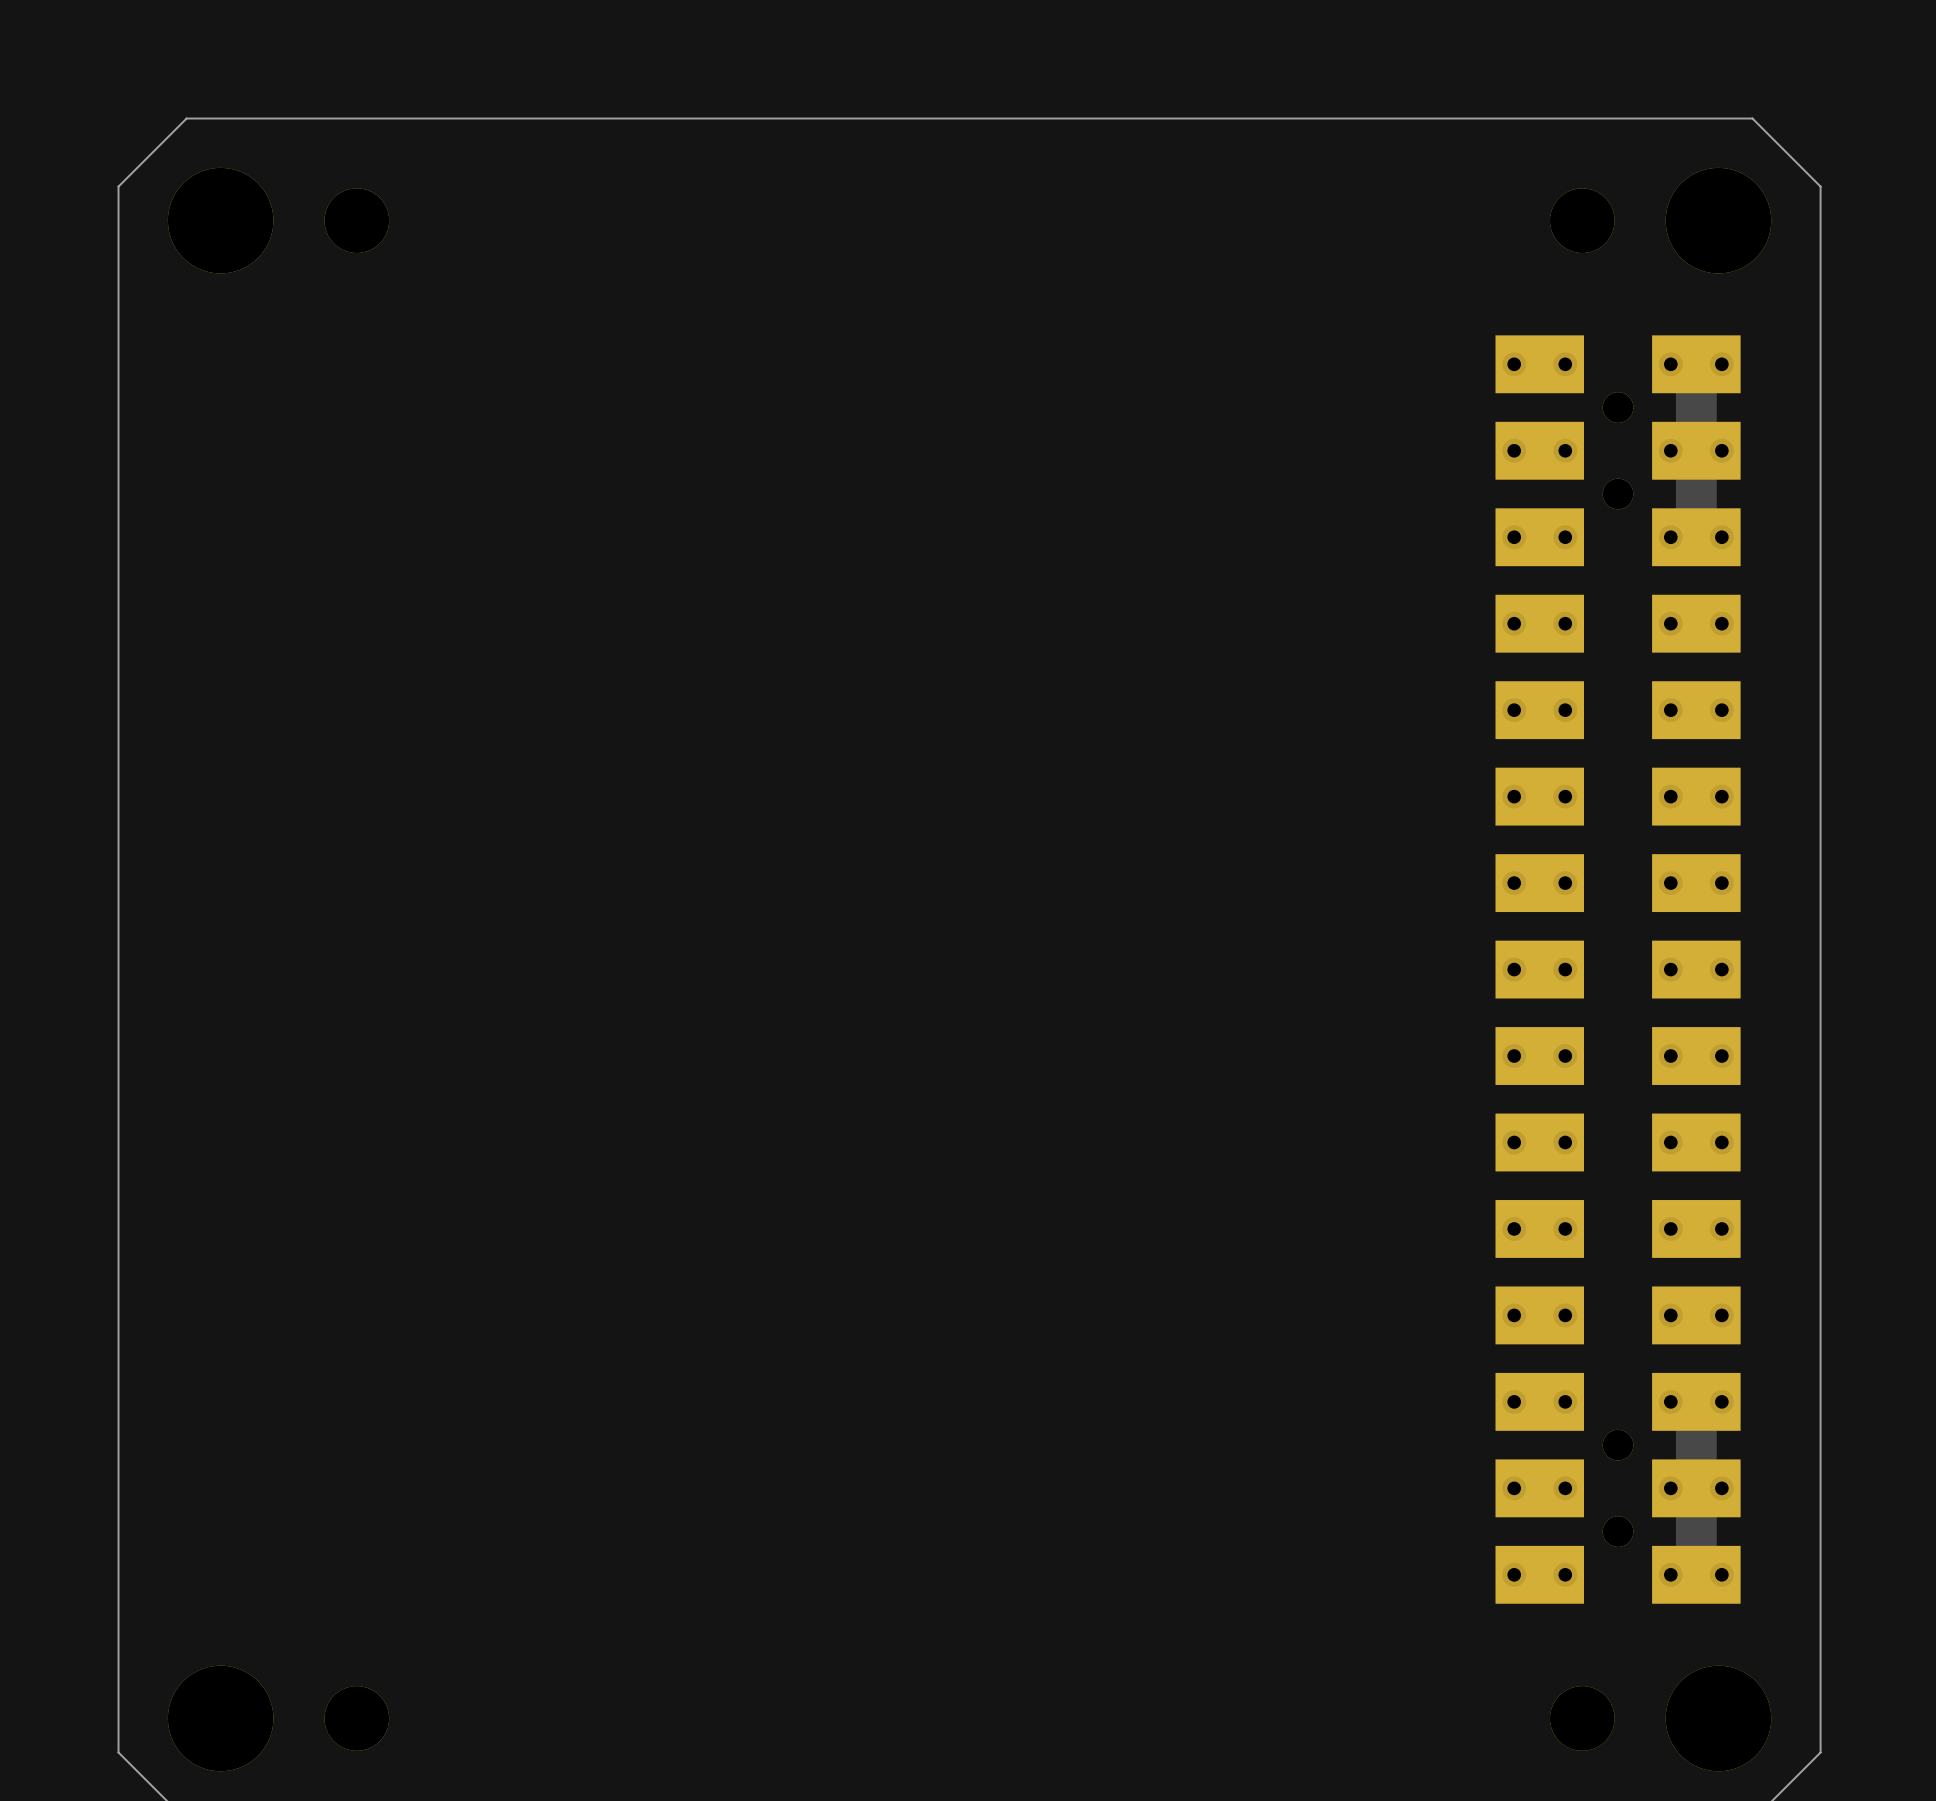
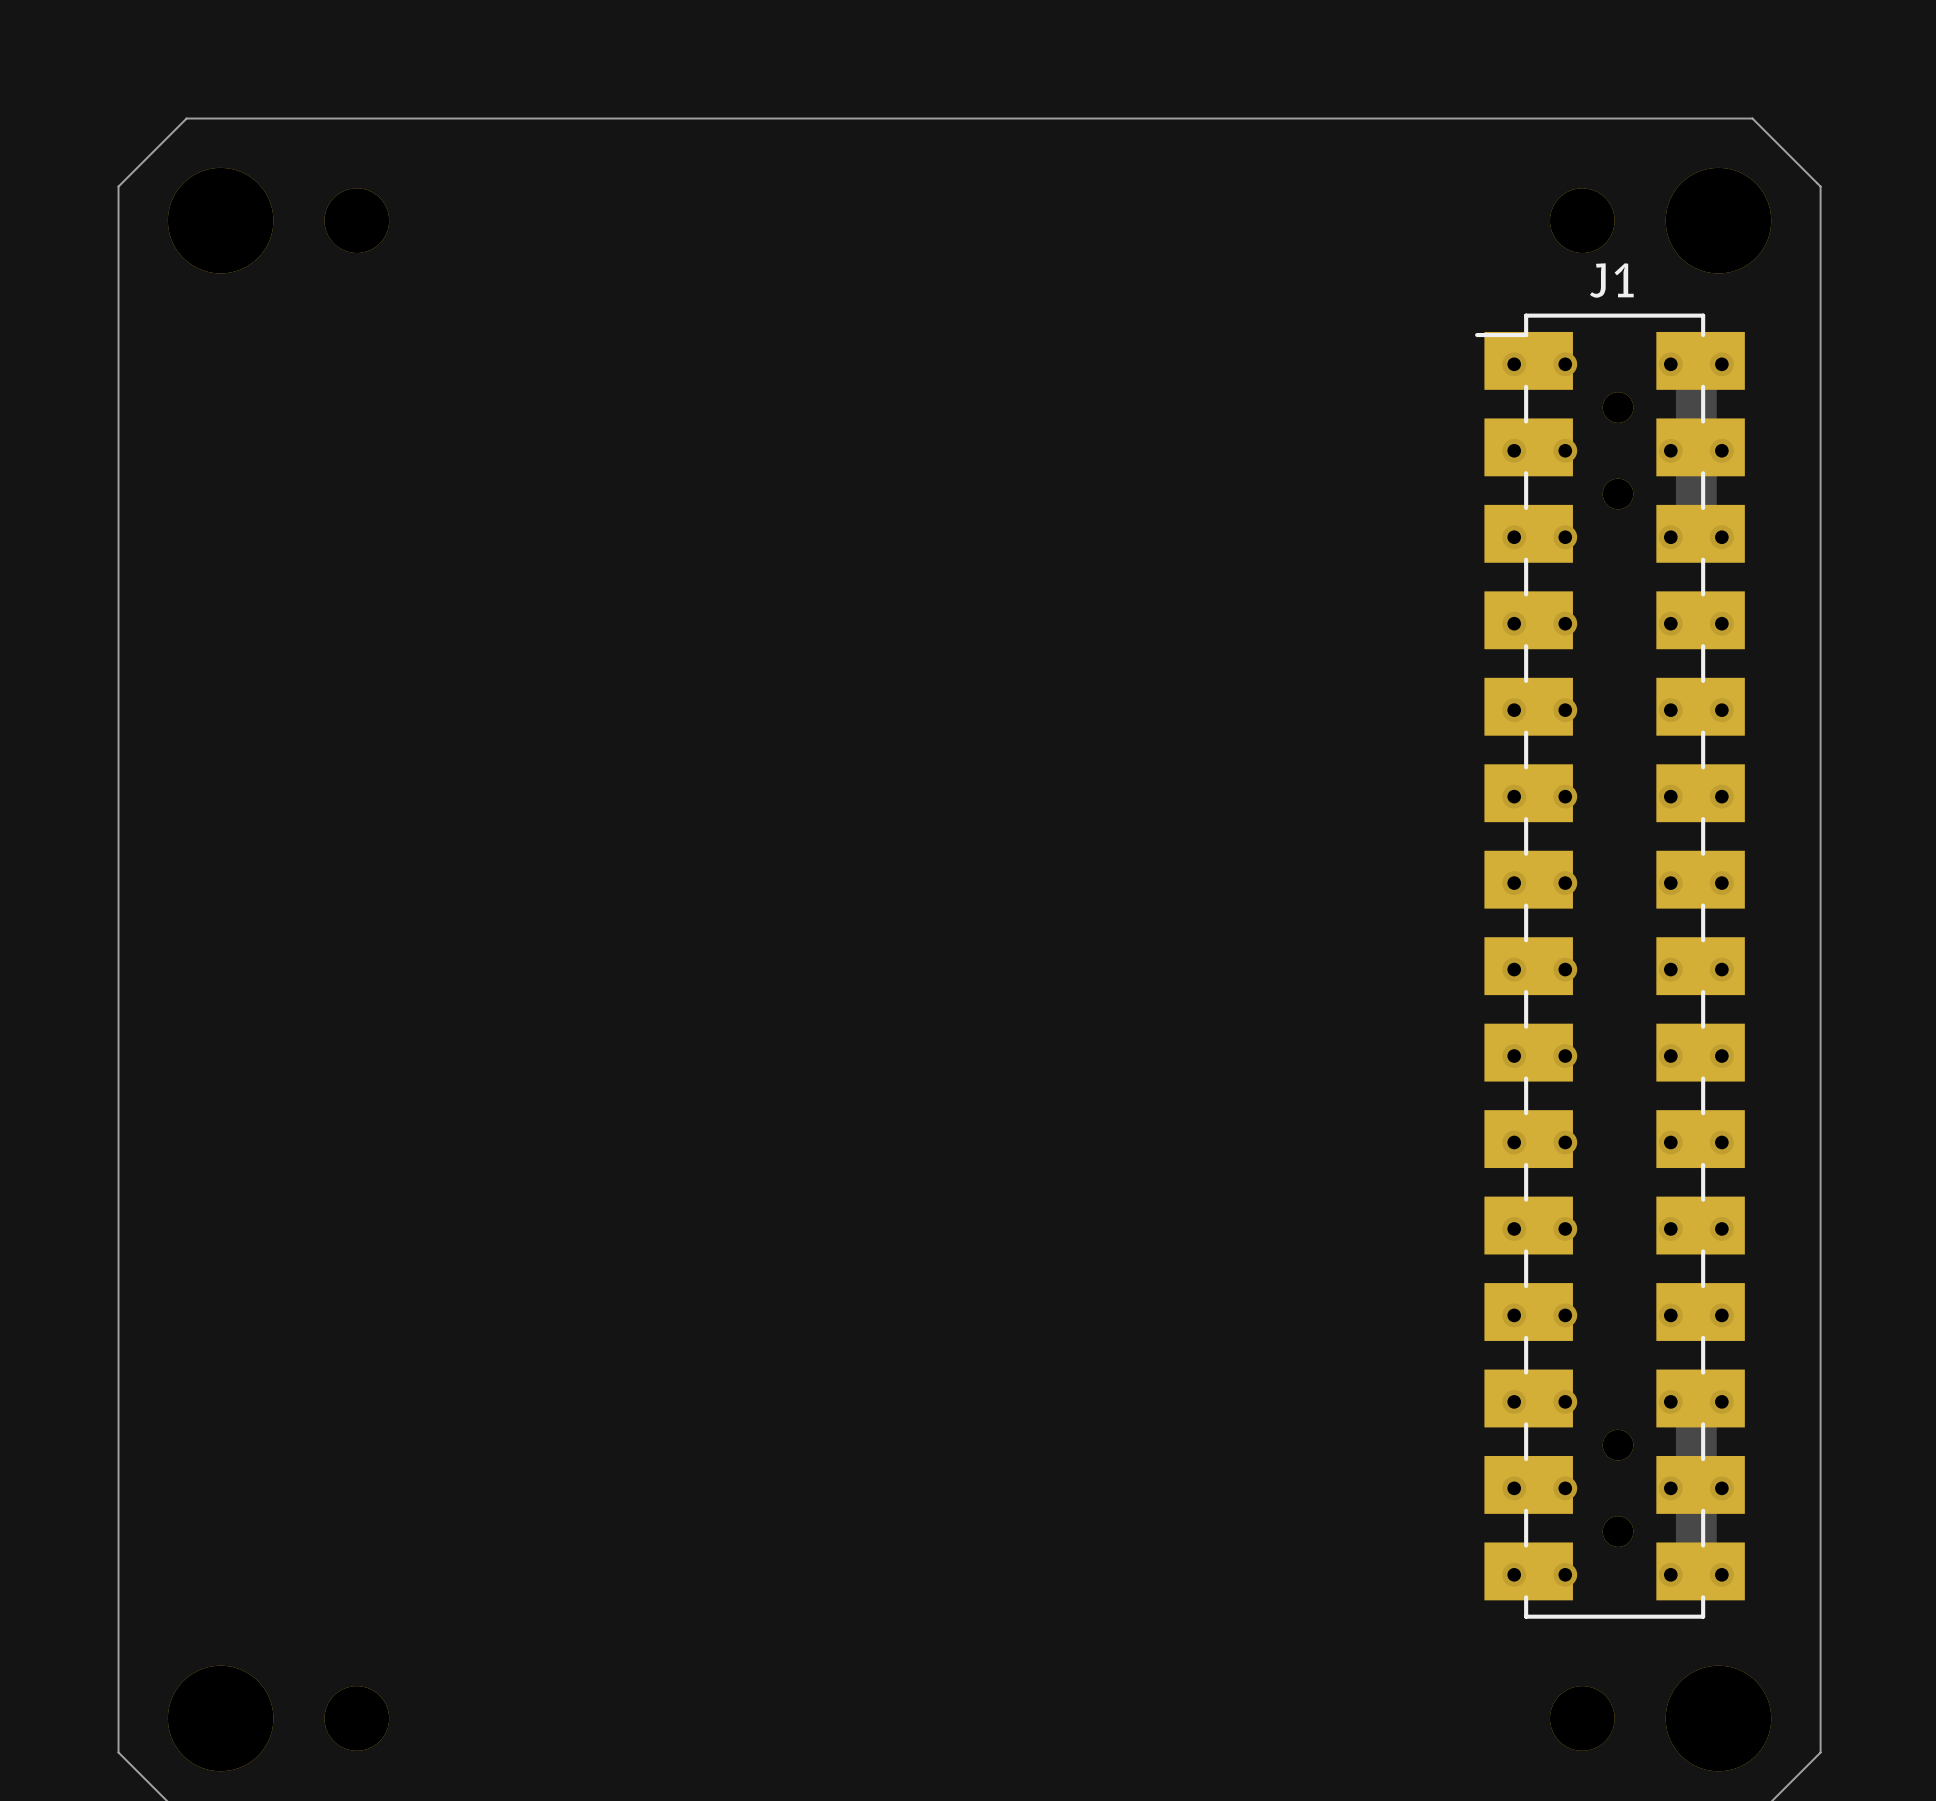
part: (1539, 364) -> none
part: (1696, 364) -> none
part: (1539, 450) -> none
part: (1696, 450) -> none
part: (1539, 537) -> none
part: (1696, 537) -> none
part: (1539, 623) -> none
part: (1696, 623) -> none
part: (1539, 710) -> none
part: (1696, 710) -> none
part: (1539, 796) -> none
part: (1696, 796) -> none
part: (1539, 883) -> none
part: (1696, 883) -> none
J1: none -> (1609, 966)
part: (1539, 969) -> none
part: (1696, 969) -> none
part: (1539, 1056) -> none
part: (1696, 1056) -> none
part: (1539, 1142) -> none
part: (1696, 1142) -> none
part: (1539, 1228) -> none
part: (1696, 1228) -> none
part: (1539, 1315) -> none
part: (1696, 1315) -> none
part: (1539, 1401) -> none
part: (1696, 1401) -> none
part: (1539, 1488) -> none
part: (1696, 1488) -> none
part: (1539, 1574) -> none
part: (1696, 1574) -> none

